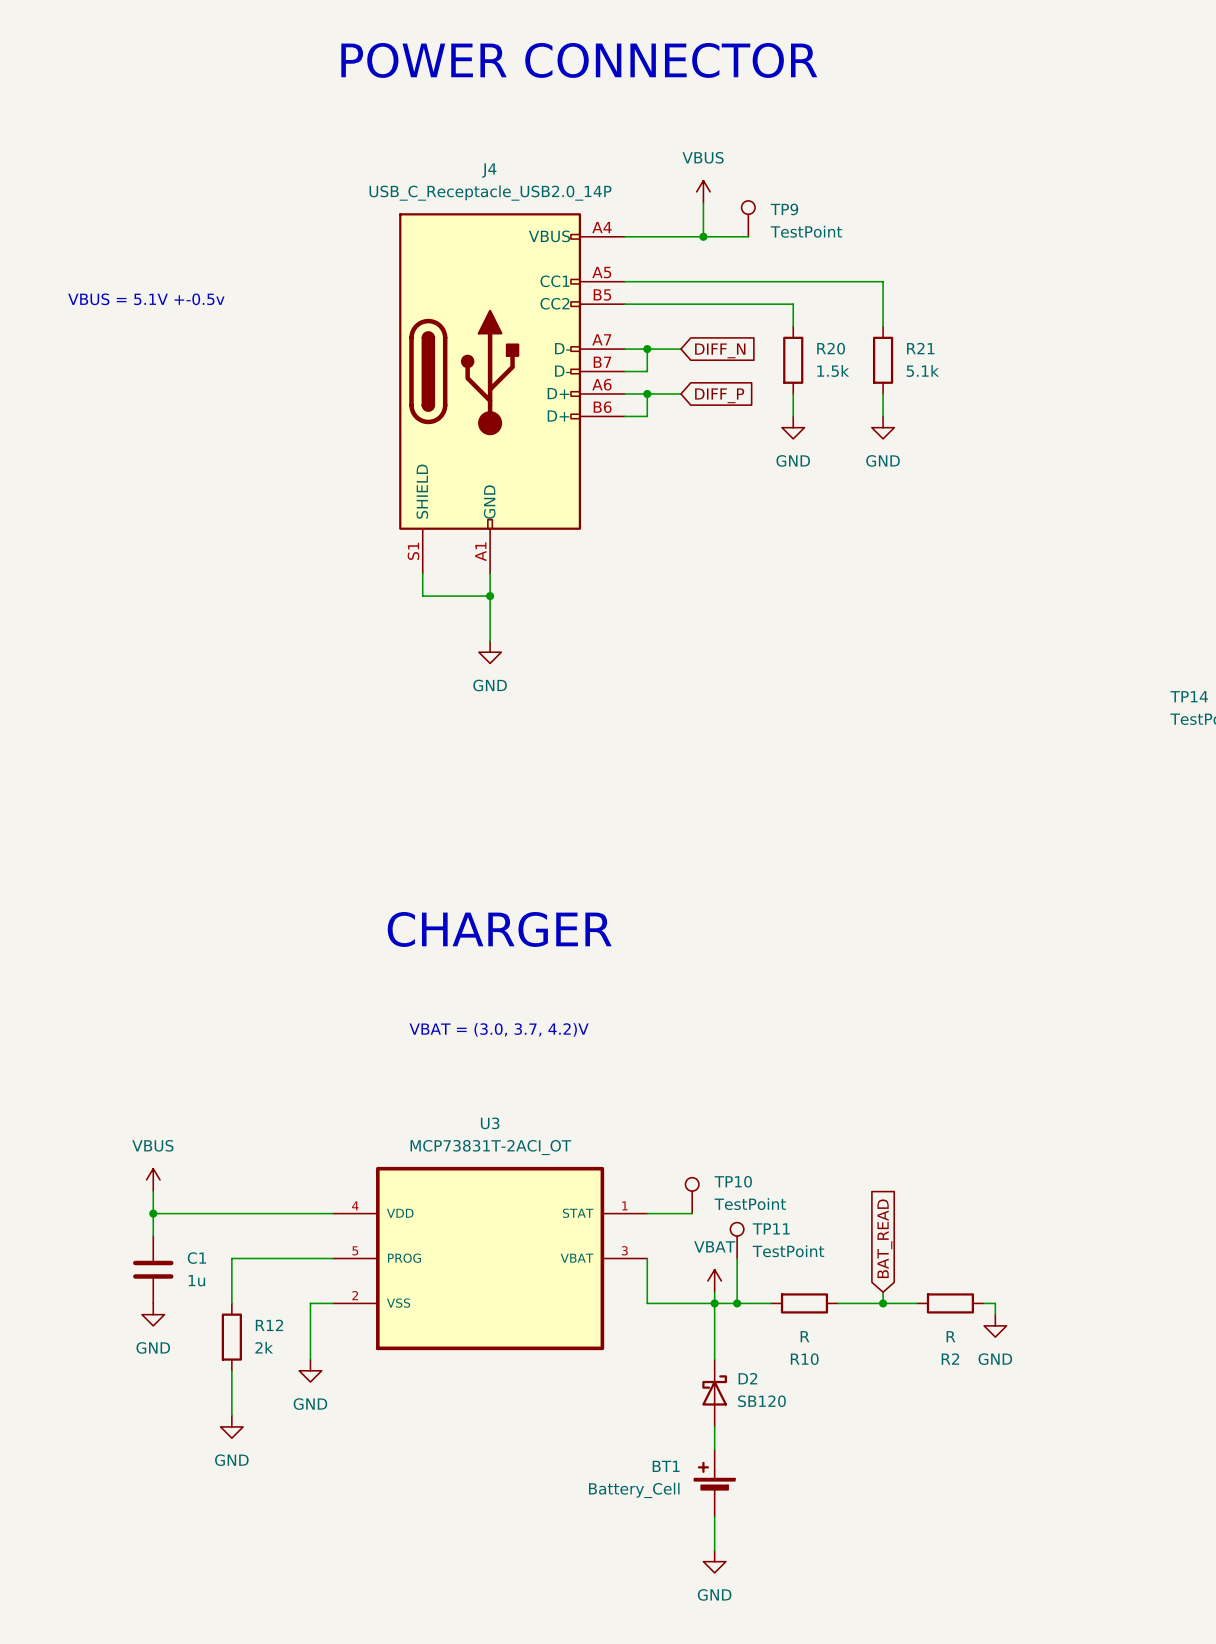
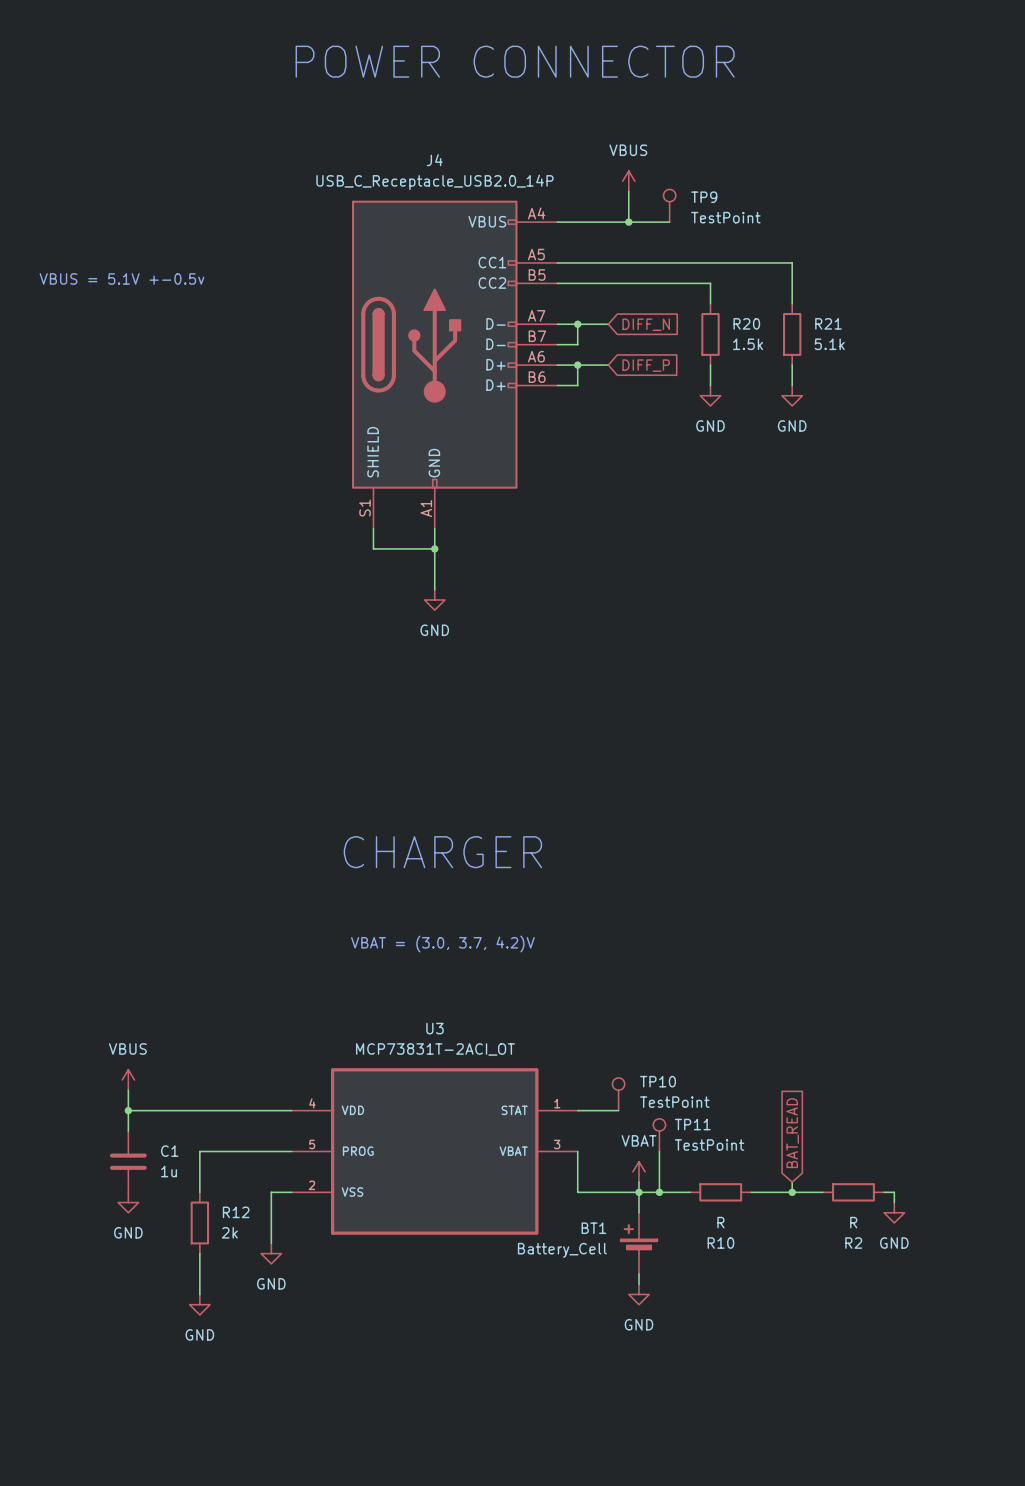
D2: SB120 (714, 1393) -> none
wire: (714, 1426) (714, 1449) -> none
BT1 position: (714, 1483) -> (639, 1243)
wire: (714, 1516) (714, 1550) -> none
power symbol position: GND (714, 1561) -> GND (639, 1294)

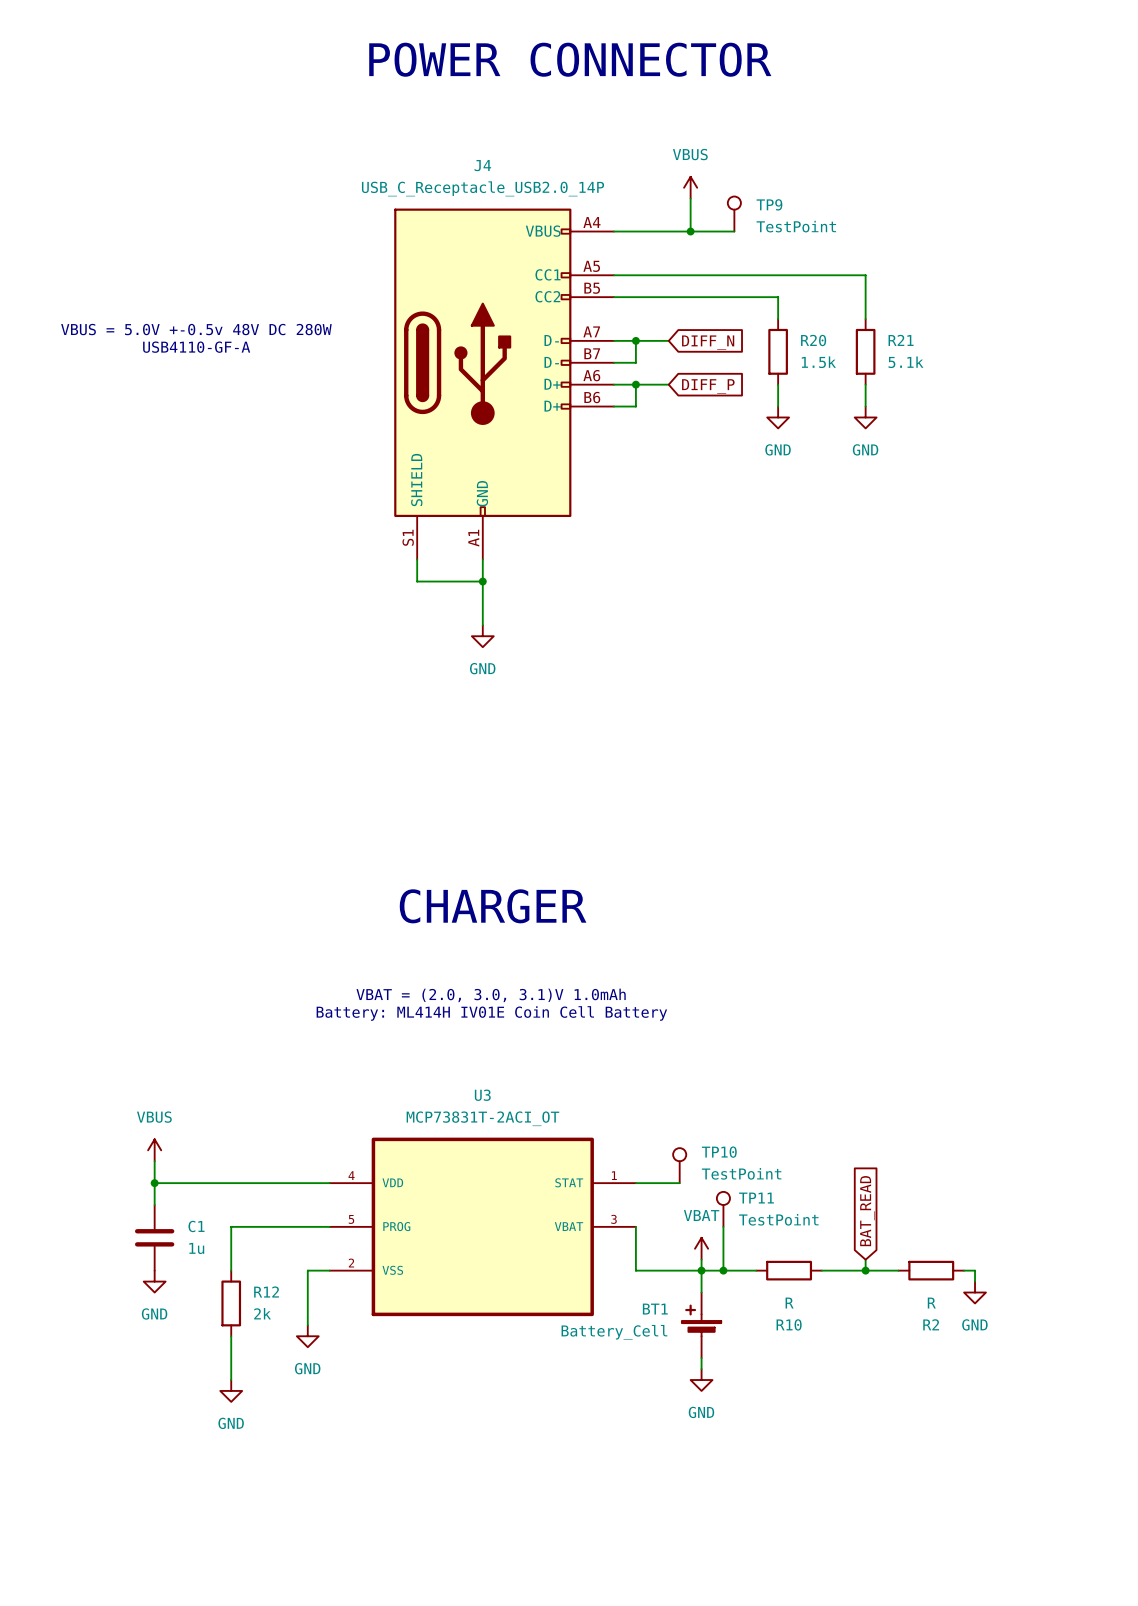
text: VBUS = 5.1V +-0.5v (121, 278) -> none
text: none -> VBUS = 5.0V +-0.5v 48V DC 280W (196, 329)
text: none -> USB4110-GF-A (196, 347)
text: VBAT = (3.0, 3.7, 4.2)V (442, 944) -> VBAT = (2.0, 3.0, 3.1)V 1.0mAh (491, 995)
text: none -> Battery: ML414H IV01E Coin Cell Battery (491, 1013)

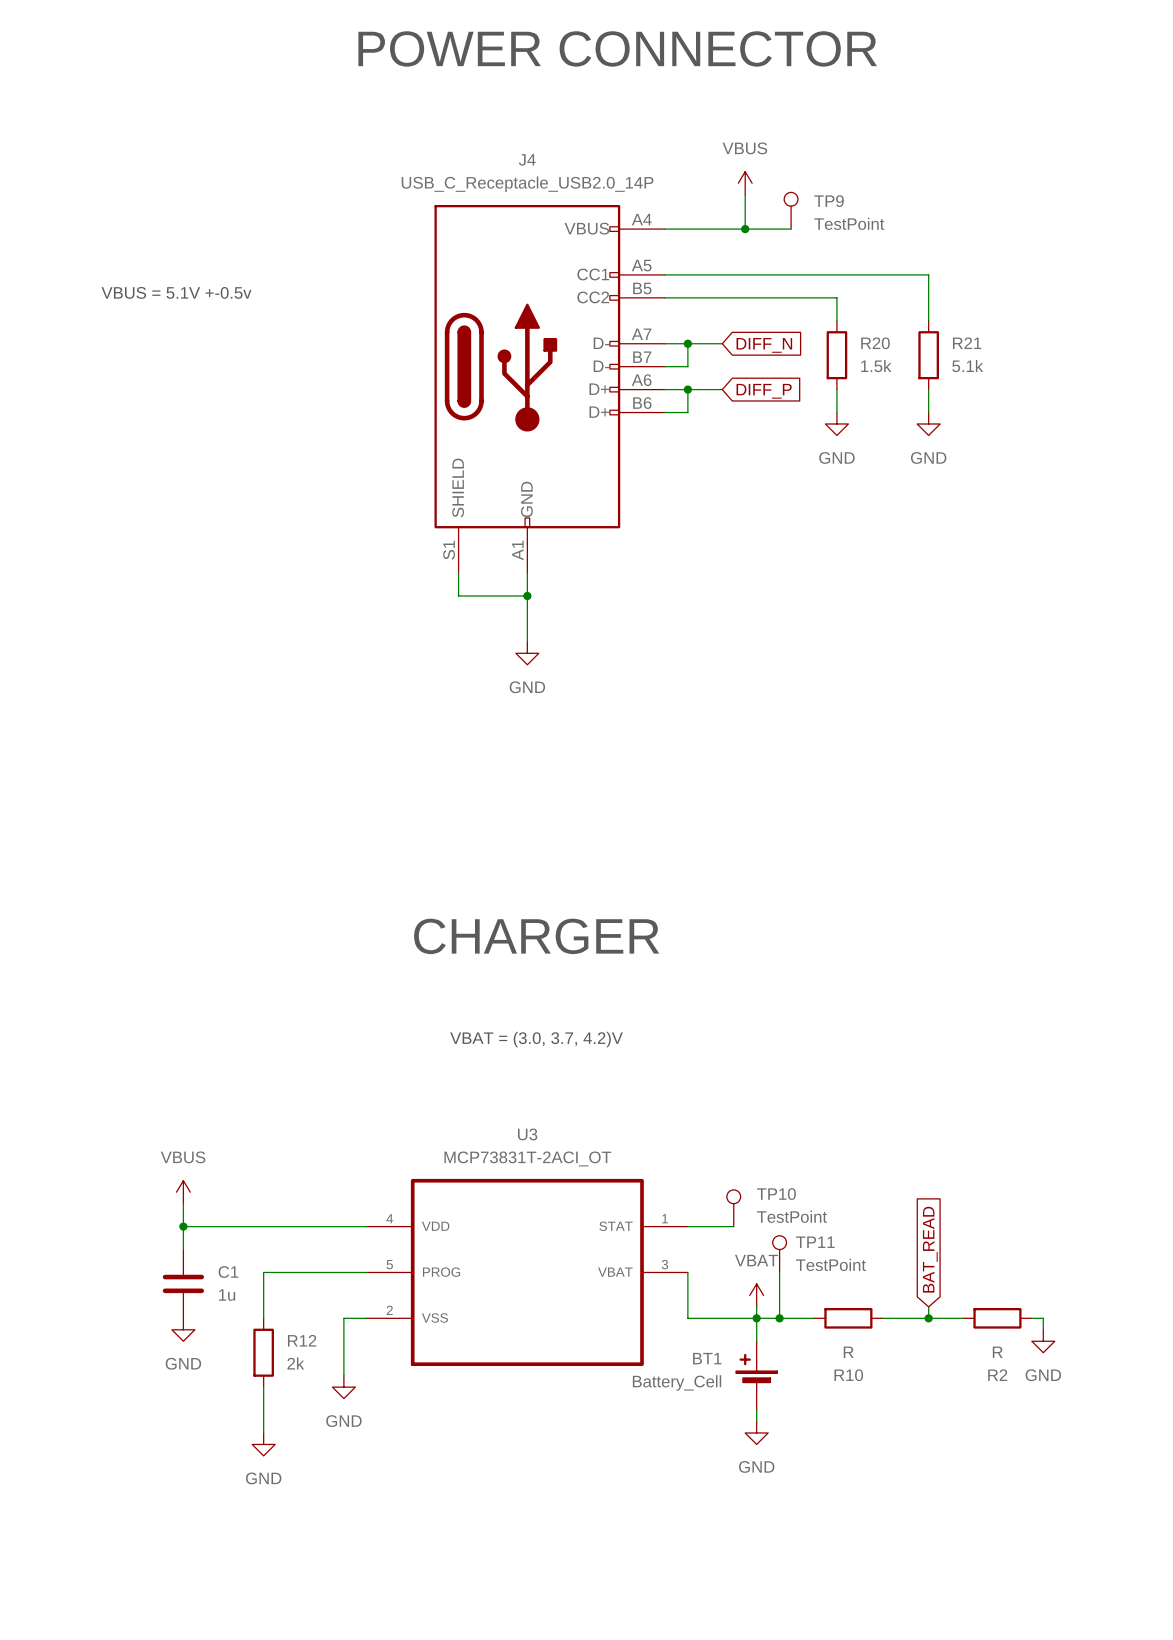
text: none -> VBUS = 5.1V +-0.5v (176, 292)
text: VBUS = 5.0V +-0.5v 48V DC 280W (196, 329) -> none
text: USB4110-GF-A (196, 347) -> none
text: VBAT = (2.0, 3.0, 3.1)V 1.0mAh (491, 995) -> VBAT = (3.0, 3.7, 4.2)V (536, 1039)
text: Battery: ML414H IV01E Coin Cell Battery (491, 1013) -> none

